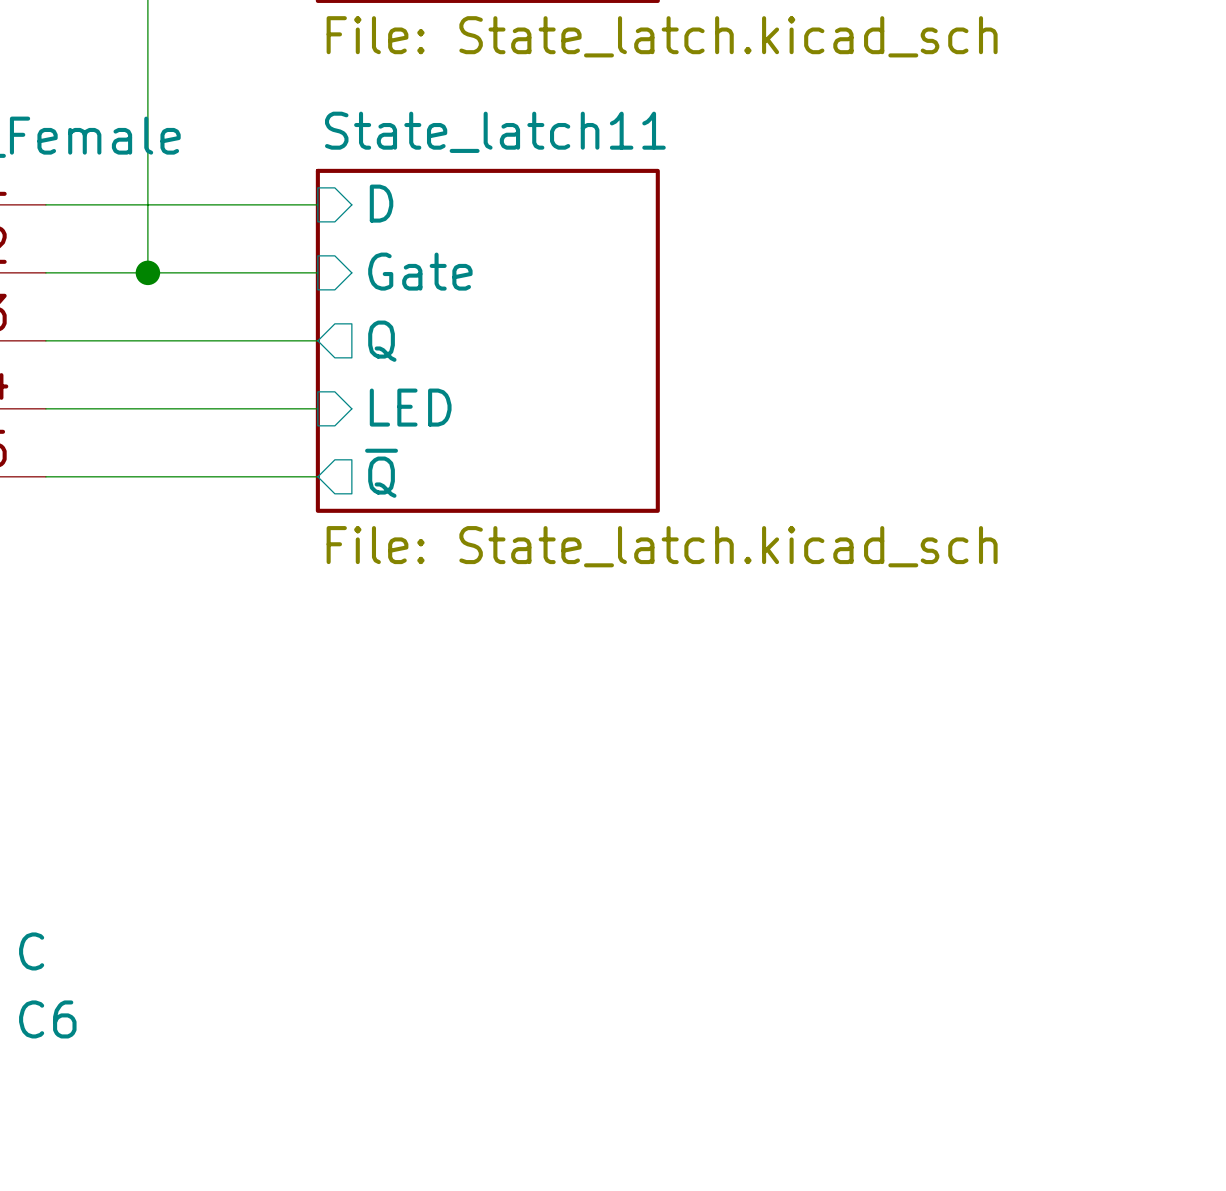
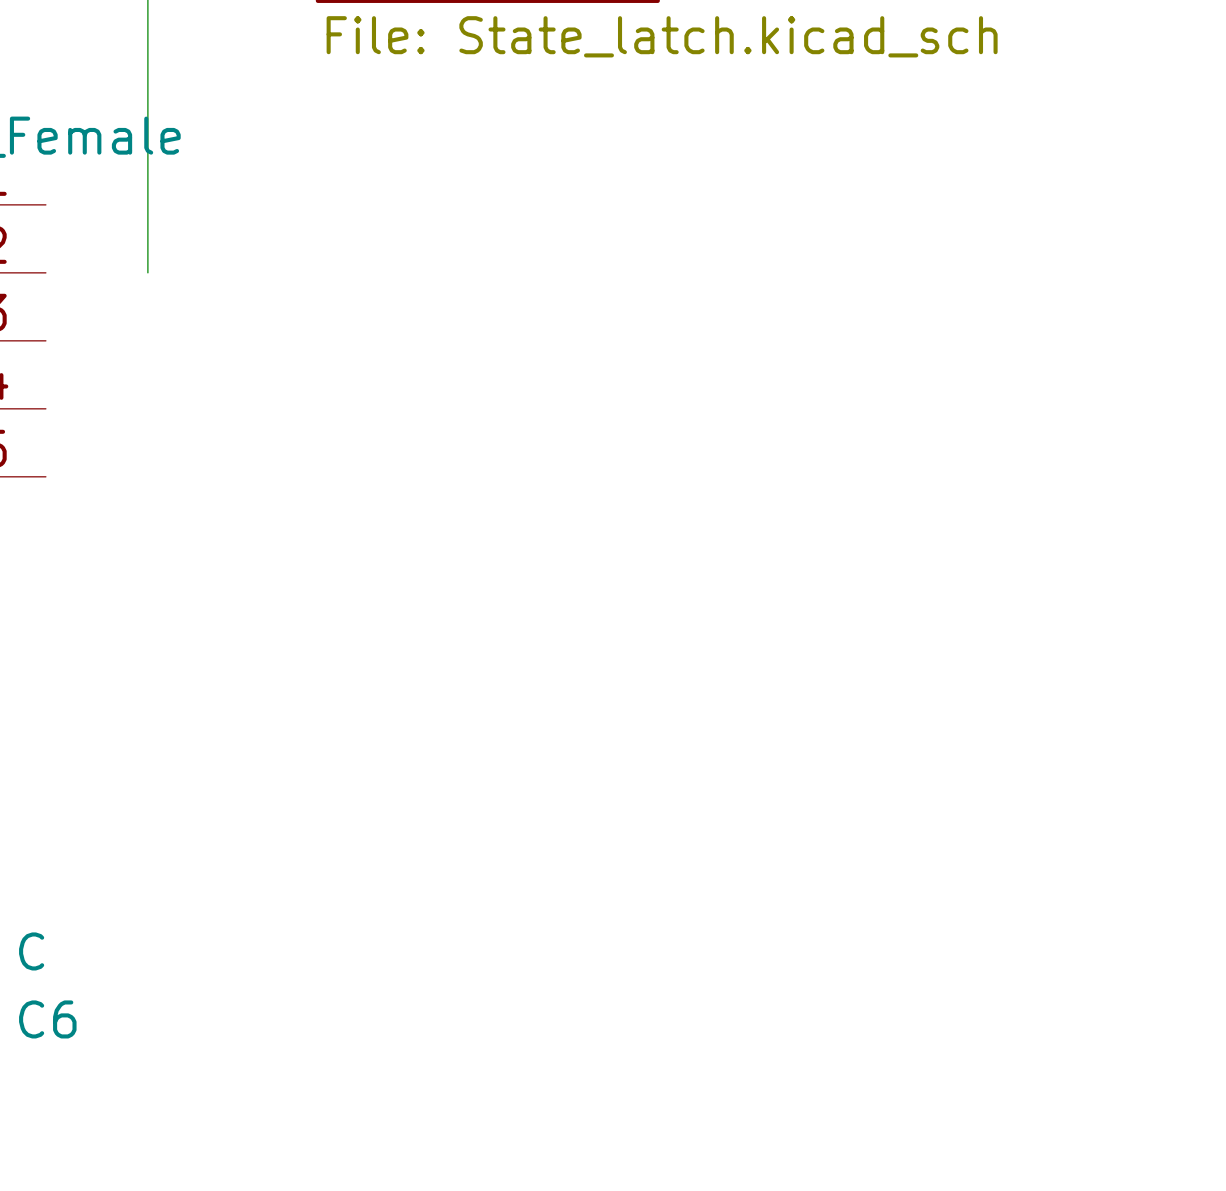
sheet pin: D (381, 203) -> none
wire: (45, 204) (317, 204) -> none
sheet pin: Gate (420, 271) -> none
wire: (45, 272) (317, 272) -> none
junction: (147, 272) -> none
wire: (45, 340) (317, 340) -> none
sheet State_latch11: File: State_latch.kicad_sch (487, 340) -> none
sheet pin: Q (382, 341) -> none
sheet pin: LED (410, 407) -> none
wire: (45, 408) (317, 408) -> none
sheet pin: ~{Q} (381, 473) -> none
wire: (45, 476) (317, 476) -> none

